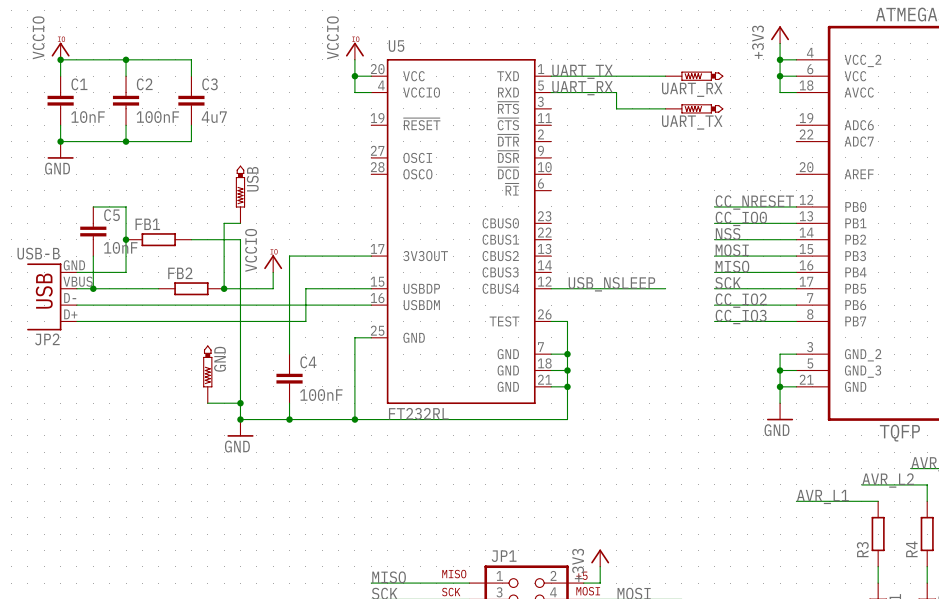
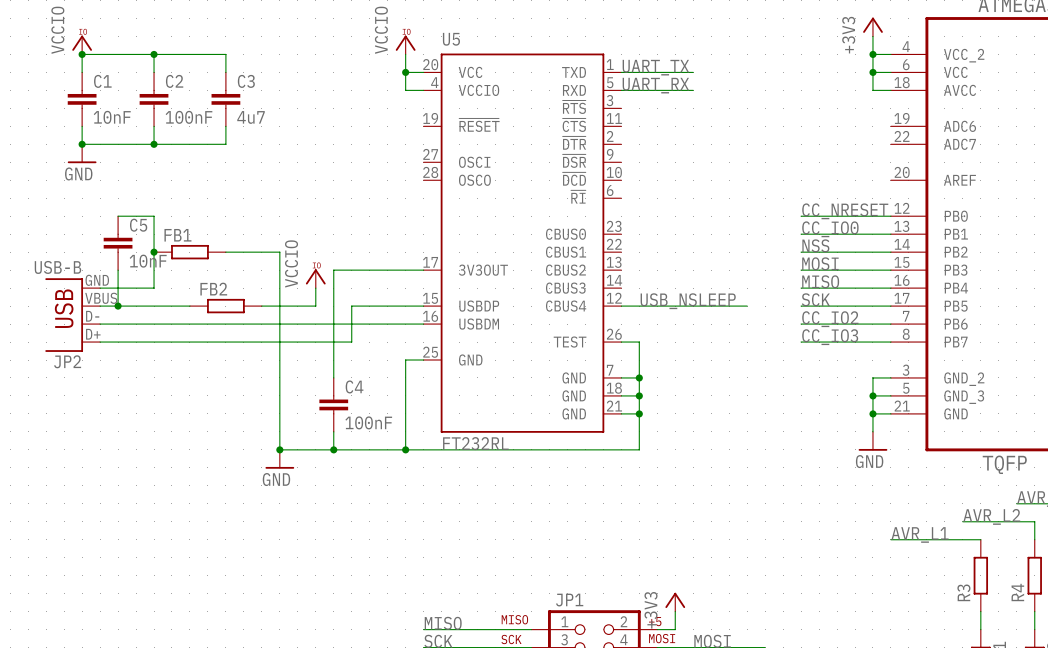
wire: (616, 76) (665, 76) -> none
UART_RX: (694, 76) -> none
wire: (616, 92) (616, 108) (665, 108) -> none
UART_TX: (694, 108) -> none
USB: (240, 194) -> none
wire: (240, 223) (224, 223) (224, 288) -> none
junction: (224, 288) -> none
GND: (207, 374) -> none
wire: (207, 403) (240, 403) -> none
junction: (240, 403) -> none

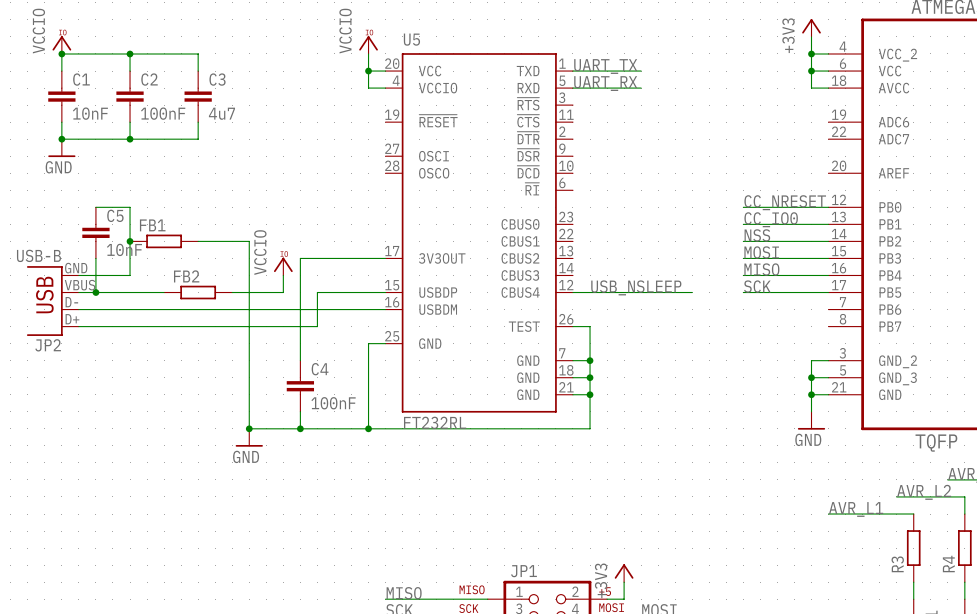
label: CC_IO2 (830, 319) -> none
wire: (801, 324) (890, 324) -> none
label: CC_IO3 (830, 337) -> none
wire: (801, 342) (890, 342) -> none

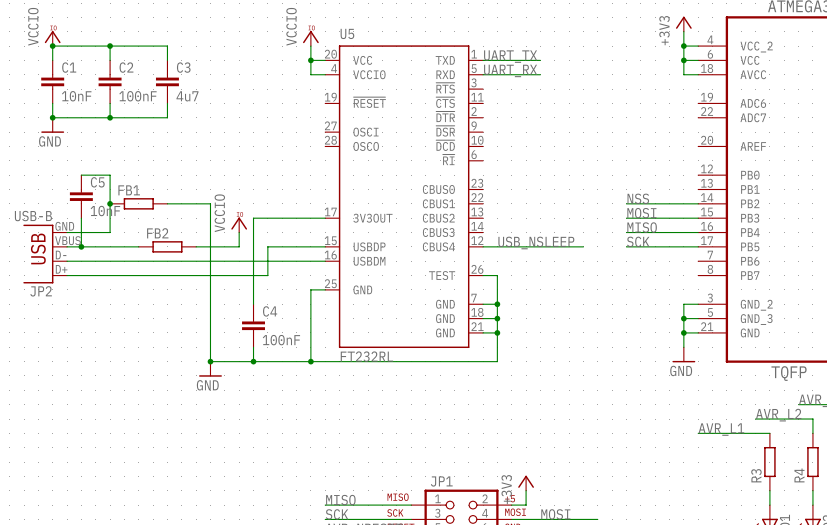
label: CC_NRESET (785, 202) -> none
wire: (743, 207) (828, 207) -> none
label: CC_IO0 (771, 219) -> none
wire: (743, 224) (828, 224) -> none

